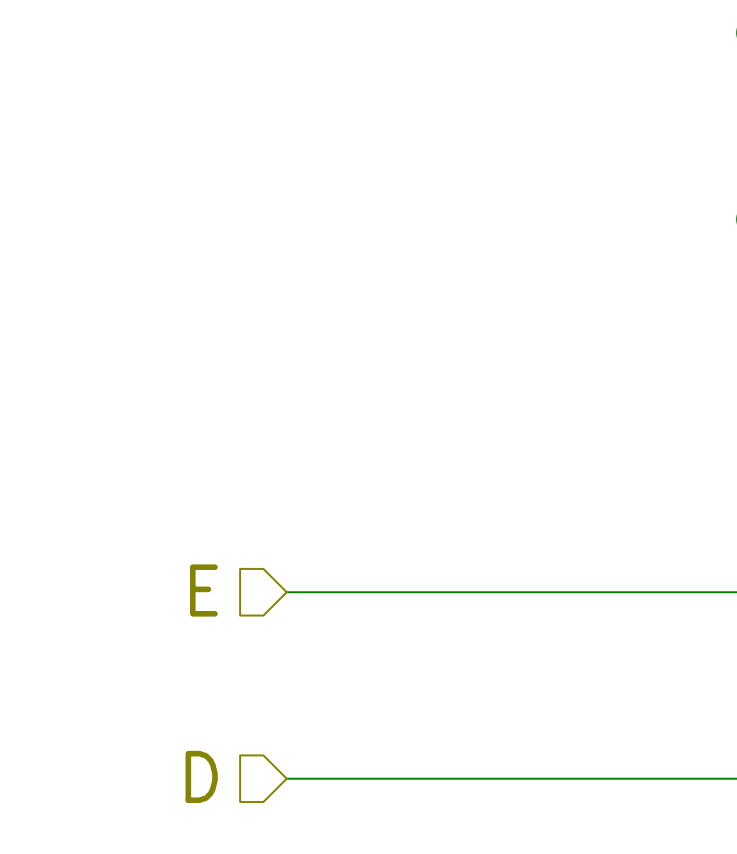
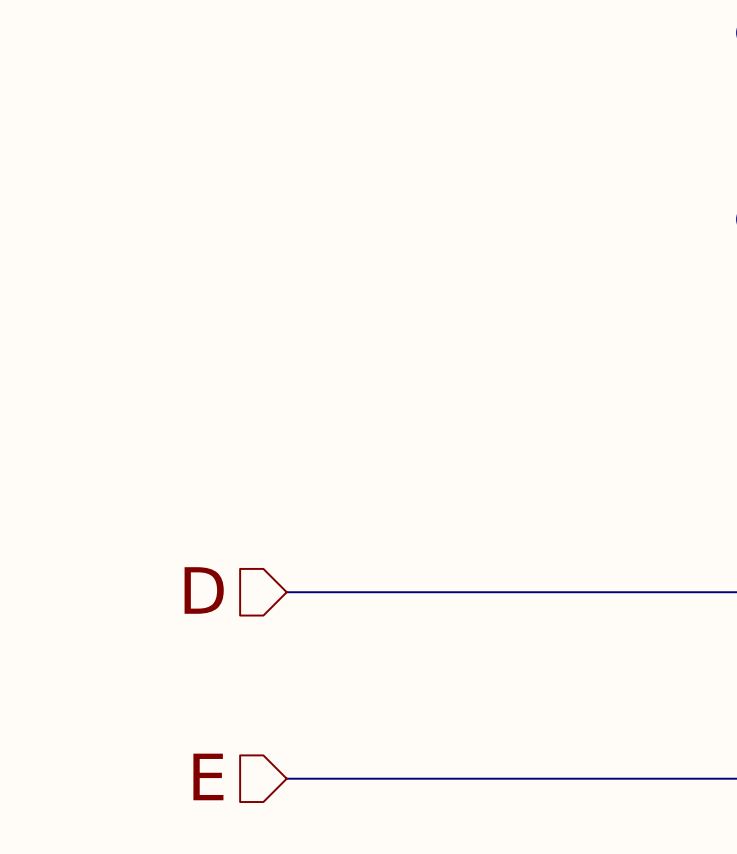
hierarchical label: E (203, 590) -> D (204, 590)
hierarchical label: D (201, 776) -> E (208, 776)

